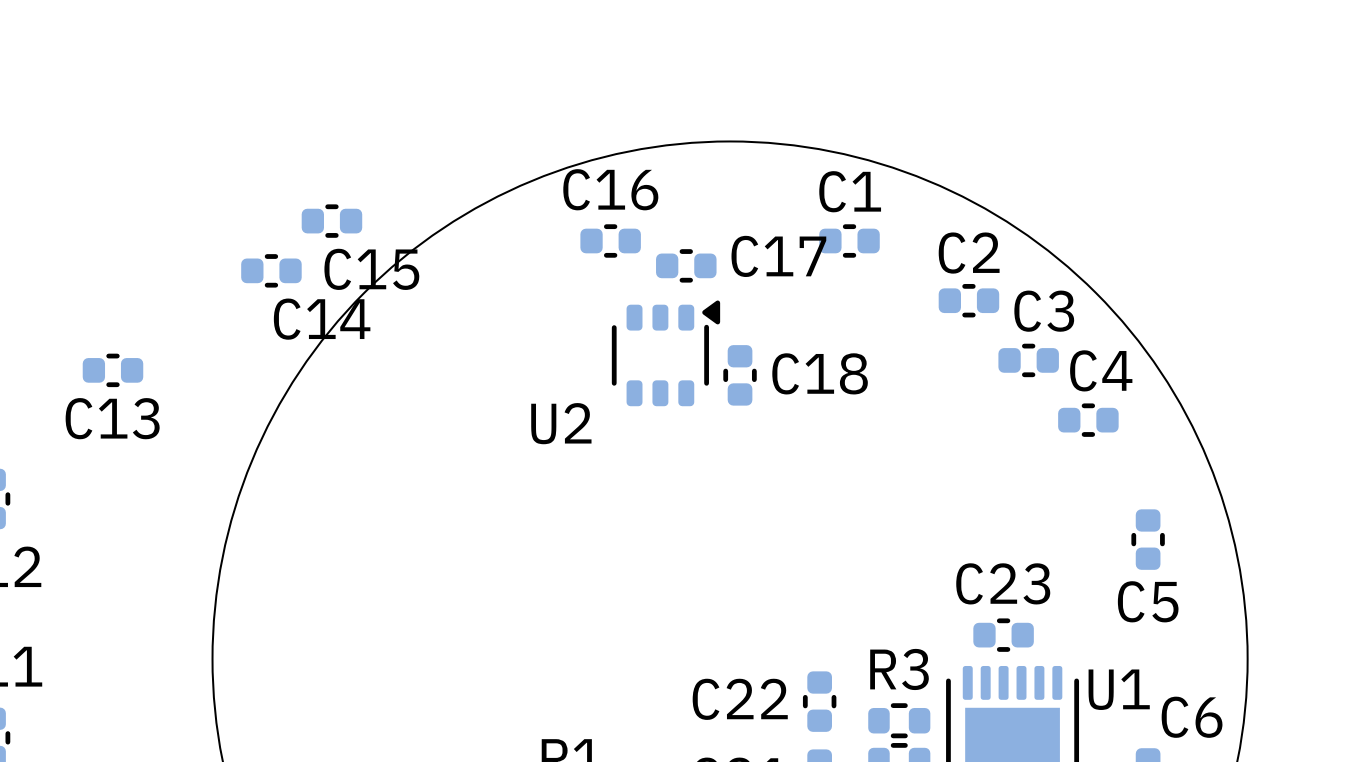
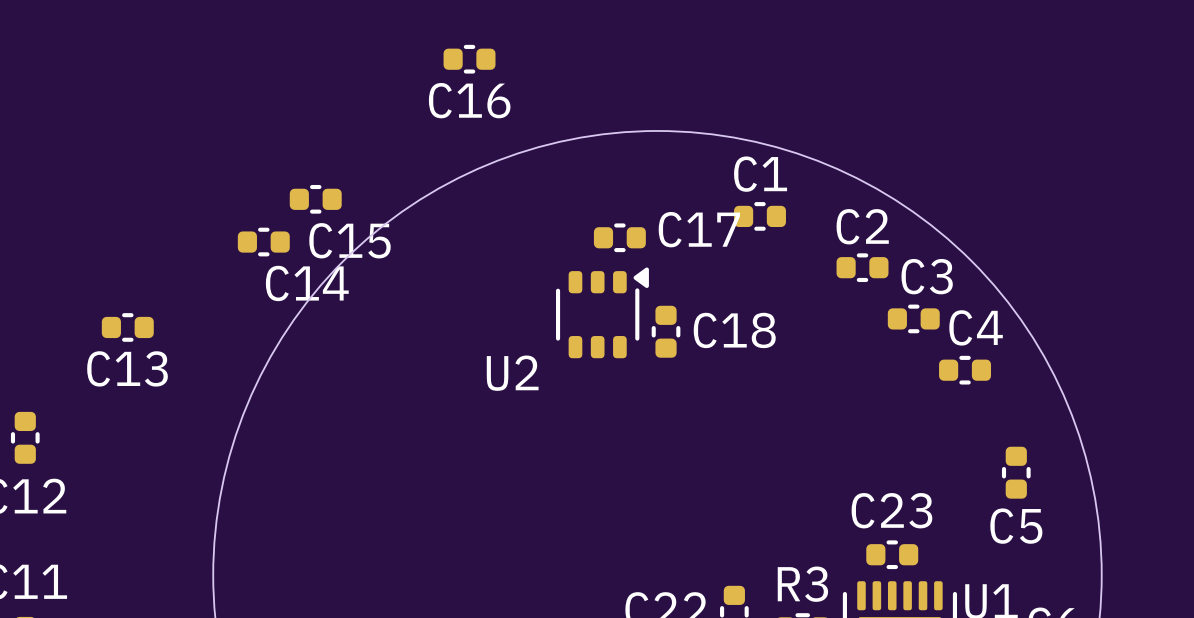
C16 name position: C16 (610, 189) -> C16 (469, 100)
C16 position: (610, 240) -> (469, 59)

